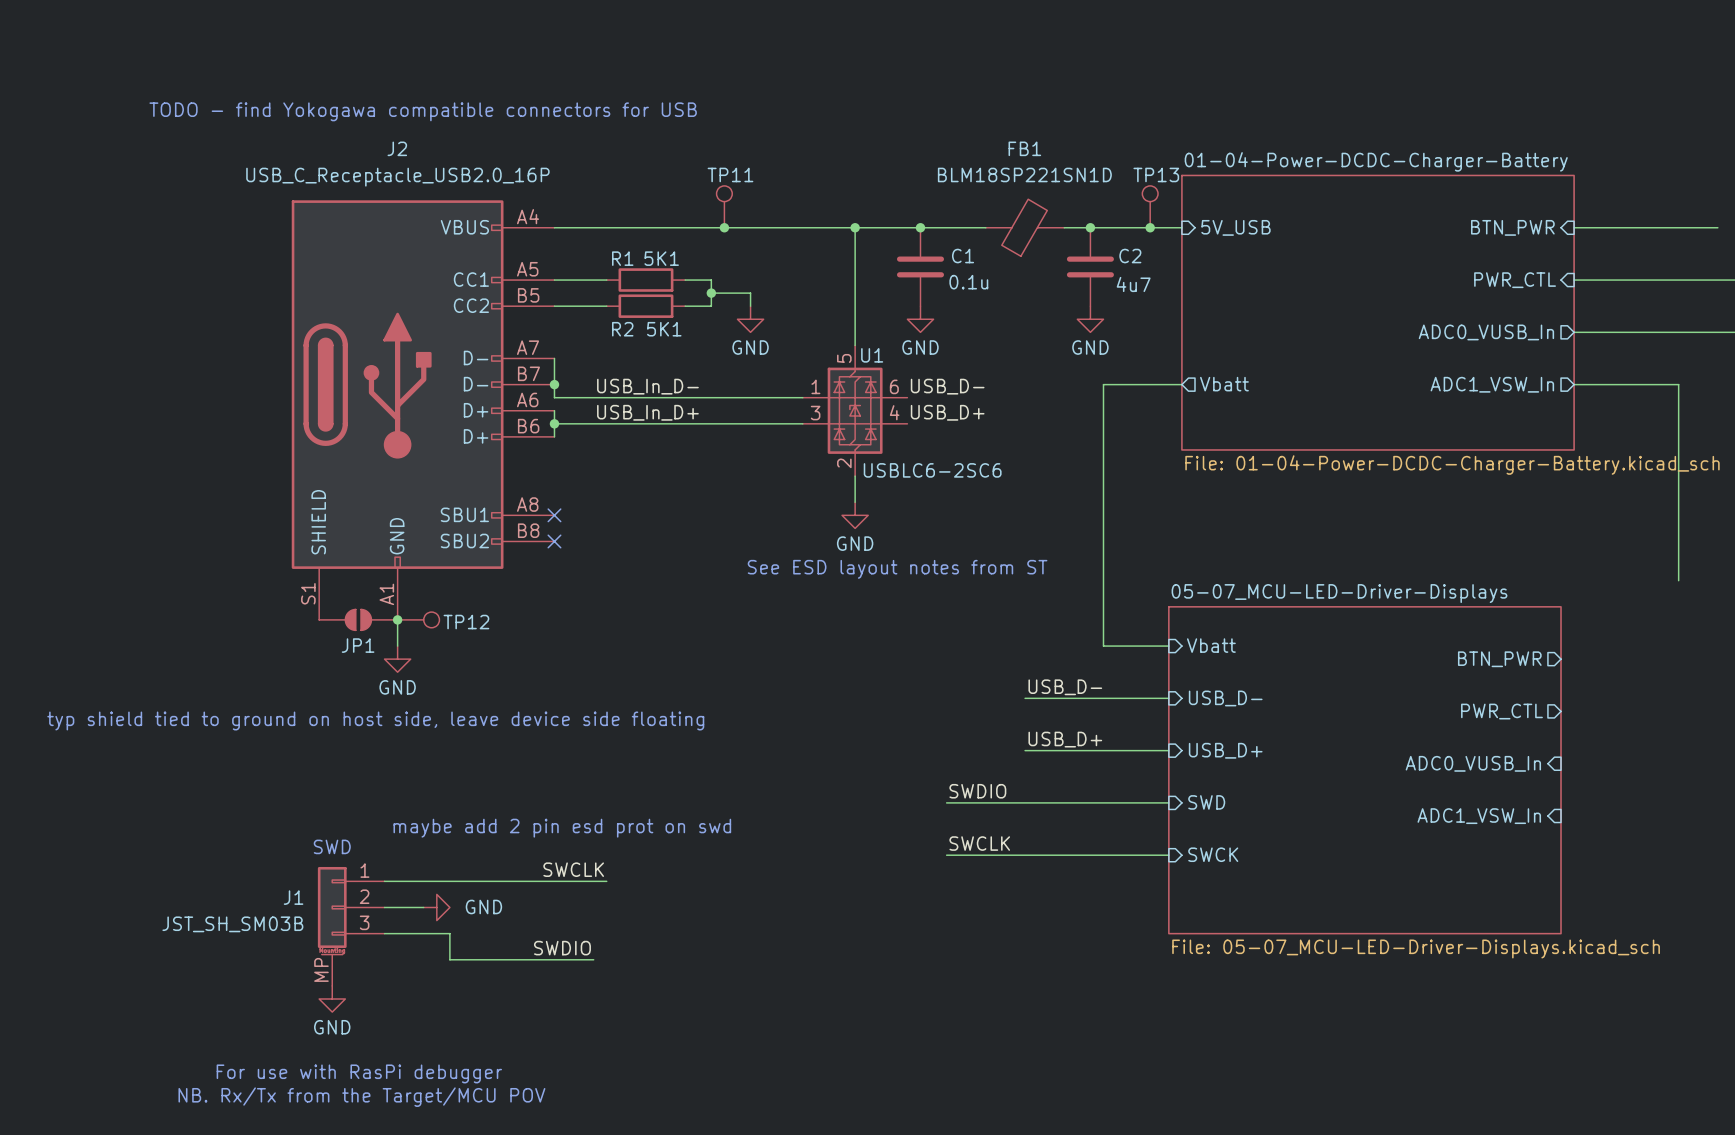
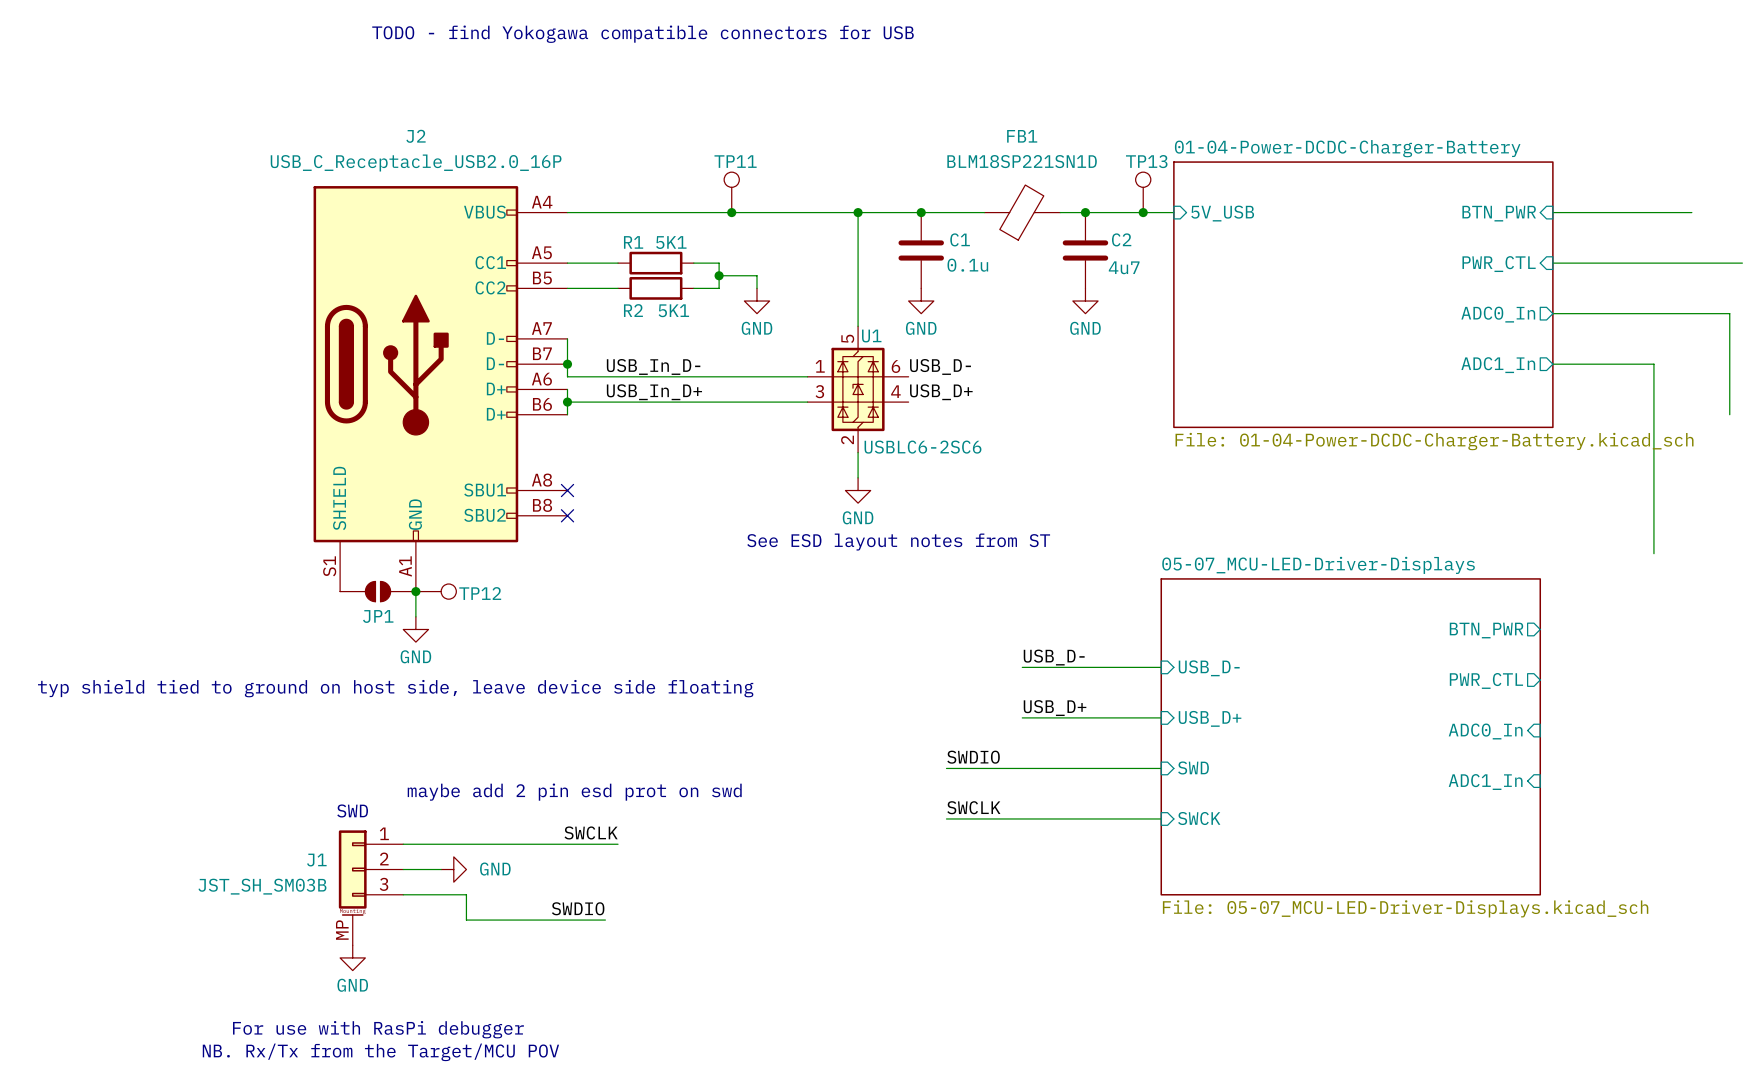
text position: TODO - find Yokogawa compatible connectors for USB (423, 111) -> TODO - find Yokogawa compatible connectors for USB (643, 34)
sheet pin: ADC0_VUSB_In (1486, 332) -> ADC0_In (1498, 314)
wire: (1181, 384) (1103, 384) (1103, 646) (1168, 646) -> none
sheet pin: Vbatt (1224, 384) -> none
sheet pin: ADC1_VSW_In (1492, 384) -> ADC1_In (1498, 365)
sheet pin: Vbatt (1211, 645) -> none
sheet pin: ADC0_VUSB_In (1473, 763) -> ADC0_In (1485, 731)
sheet pin: ADC1_VSW_In (1479, 816) -> ADC1_In (1485, 782)

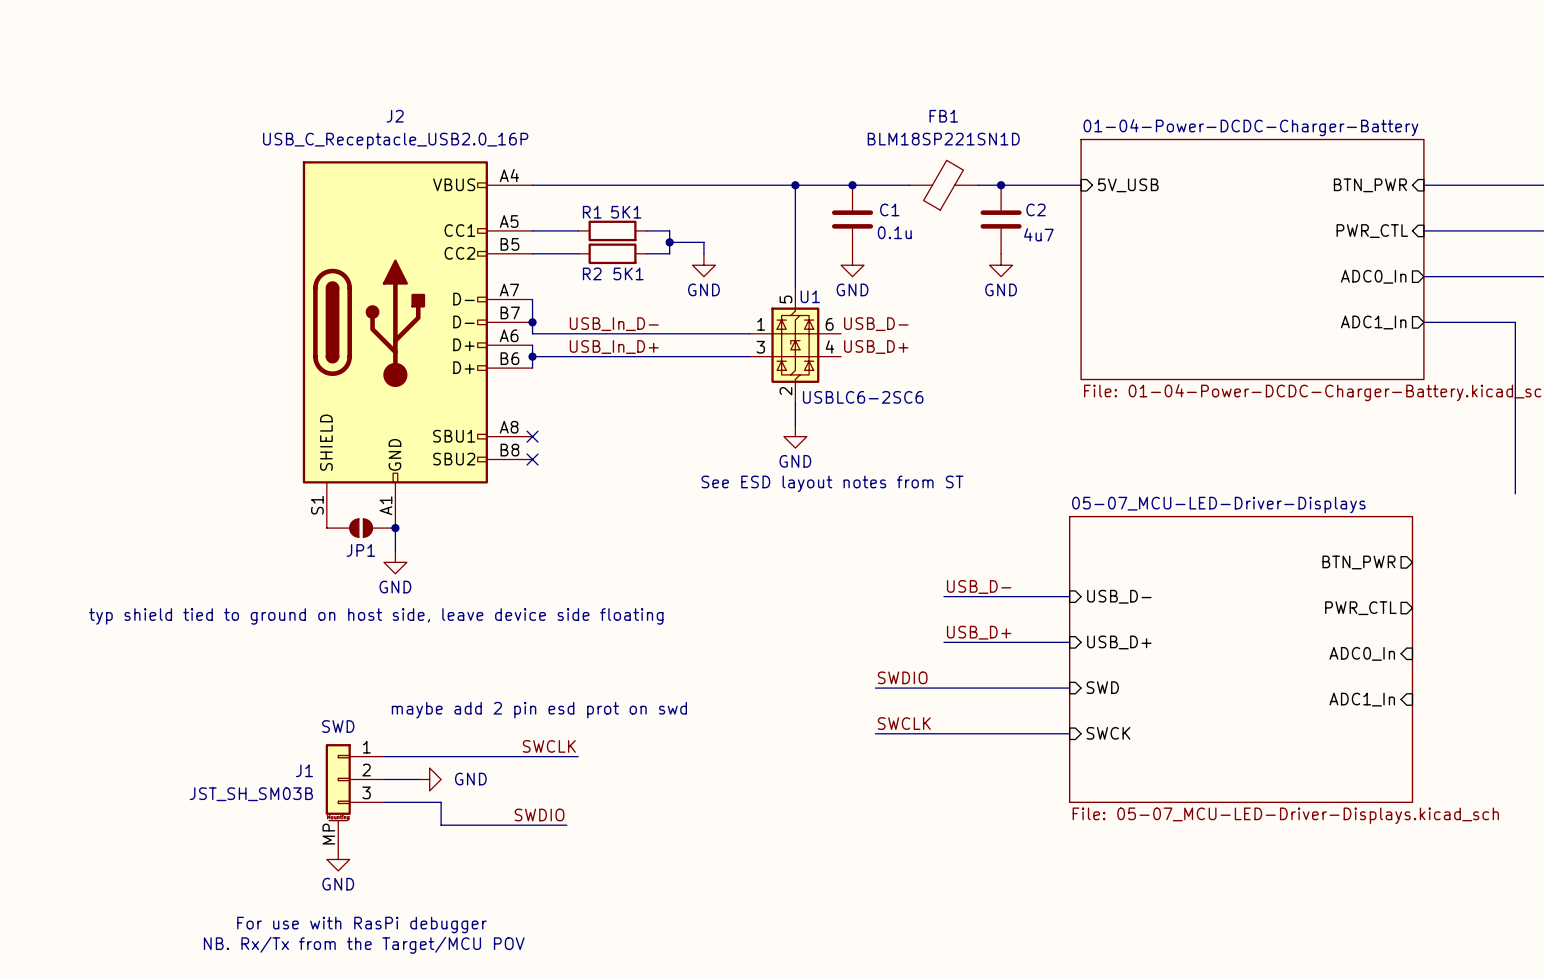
text: TODO - find Yokogawa compatible connectors for USB (643, 34) -> none
TP11: (731, 192) -> none
TP13: (1143, 192) -> none
junction: (731, 212) -> none
junction: (1143, 212) -> none
TP12: (436, 591) -> none

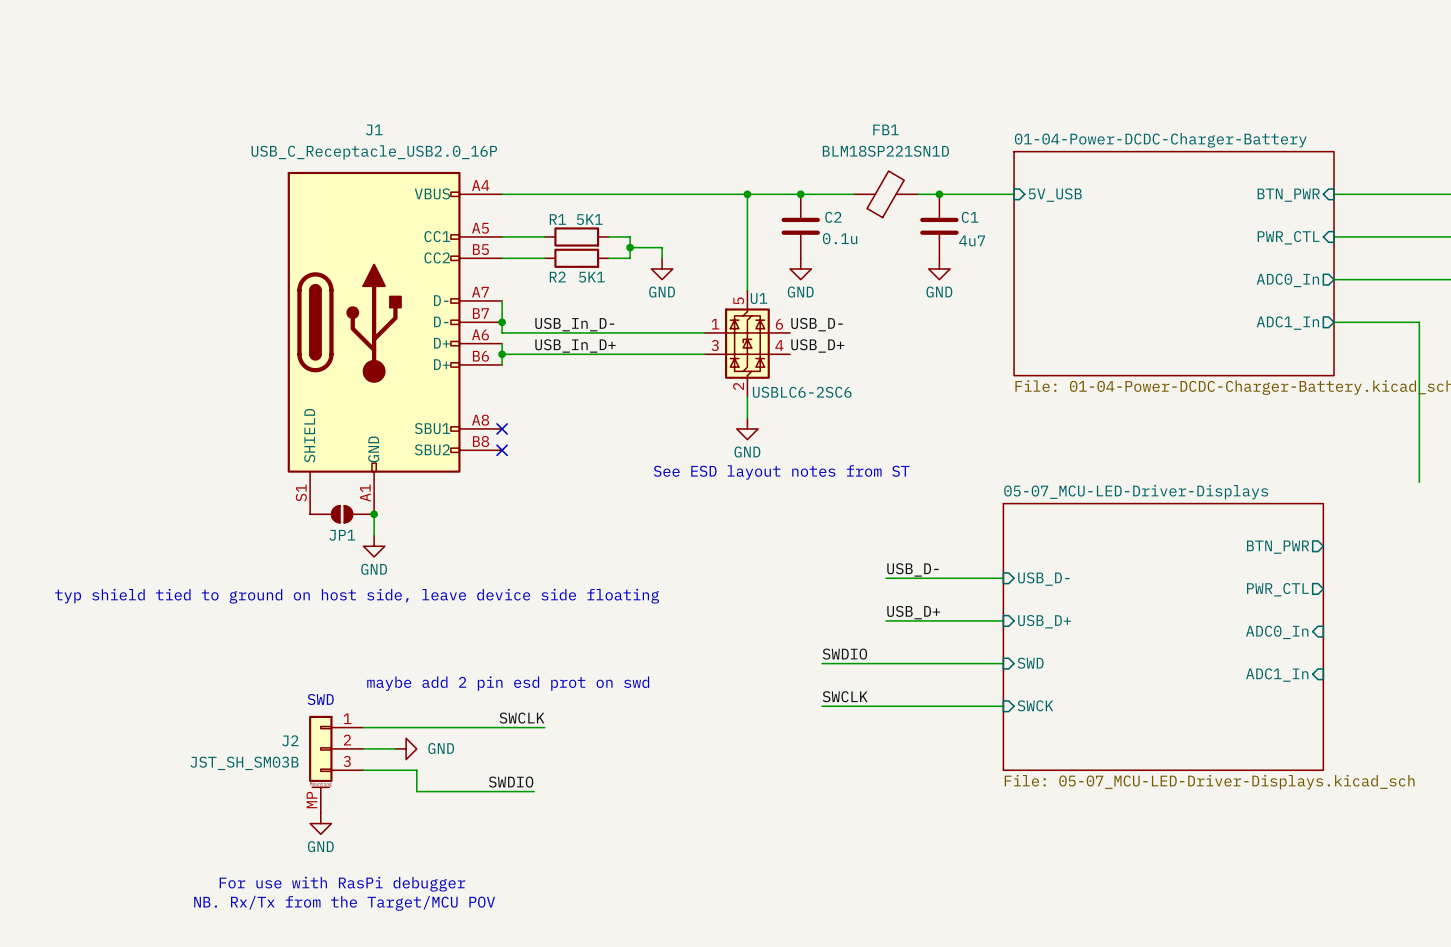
J2 name: J2 (395, 116) -> J1 (374, 130)
C1 name: C1 (889, 209) -> C2 (833, 217)
C2 name: C2 (1035, 209) -> C1 (970, 217)
J1 name: J1 (304, 770) -> J2 (290, 740)

